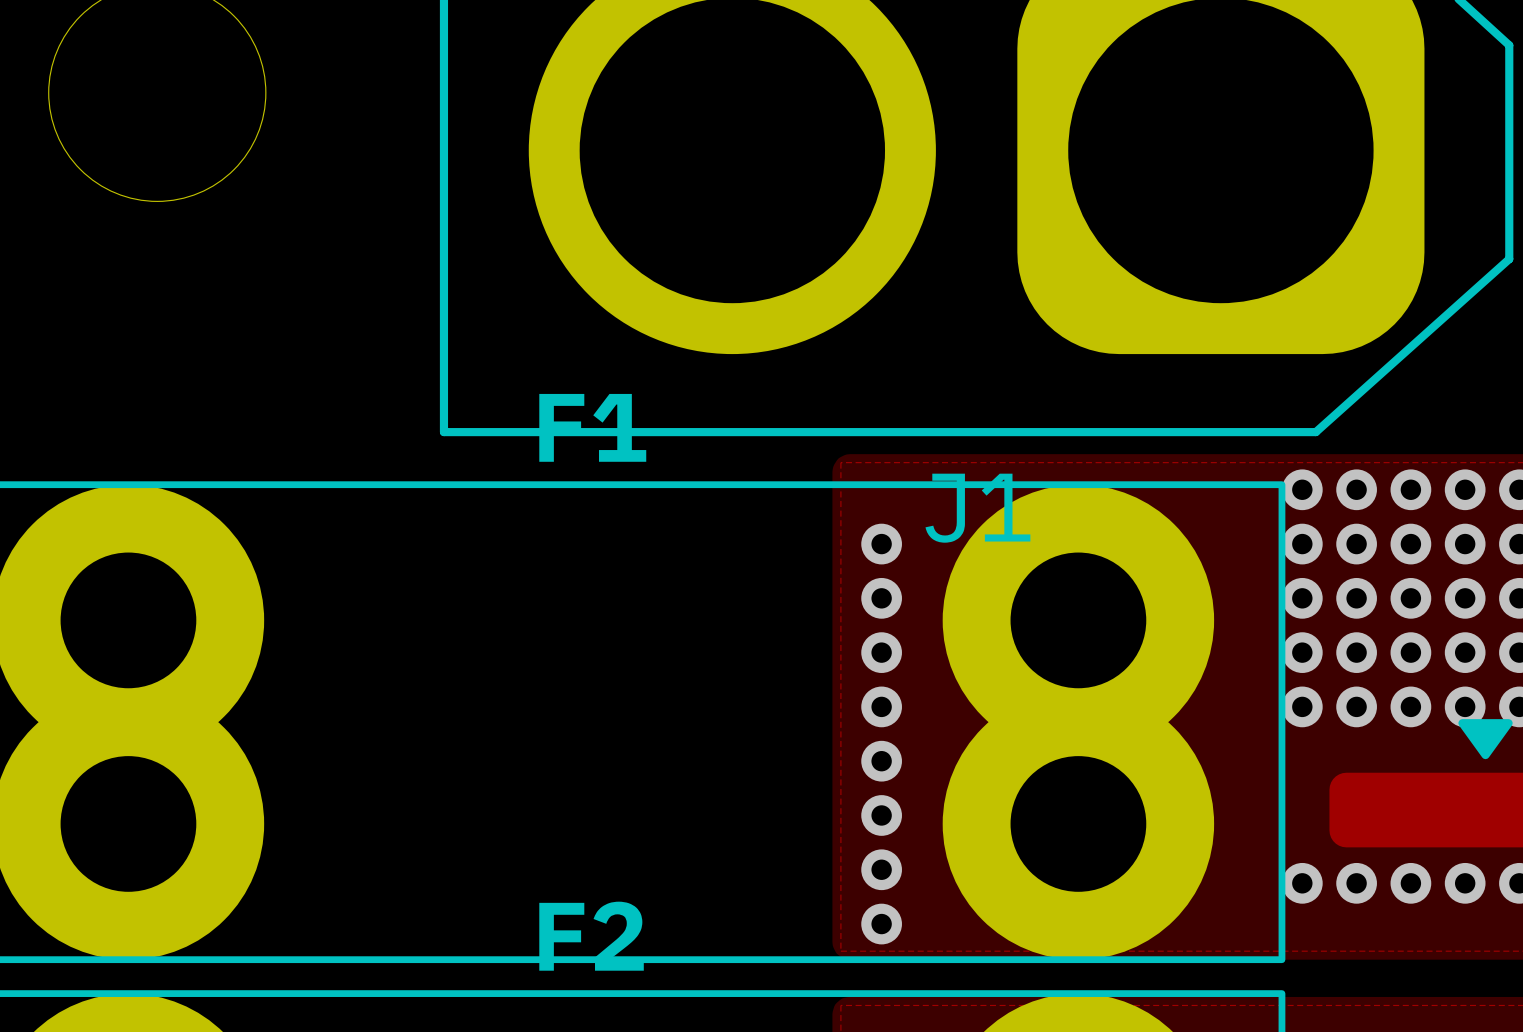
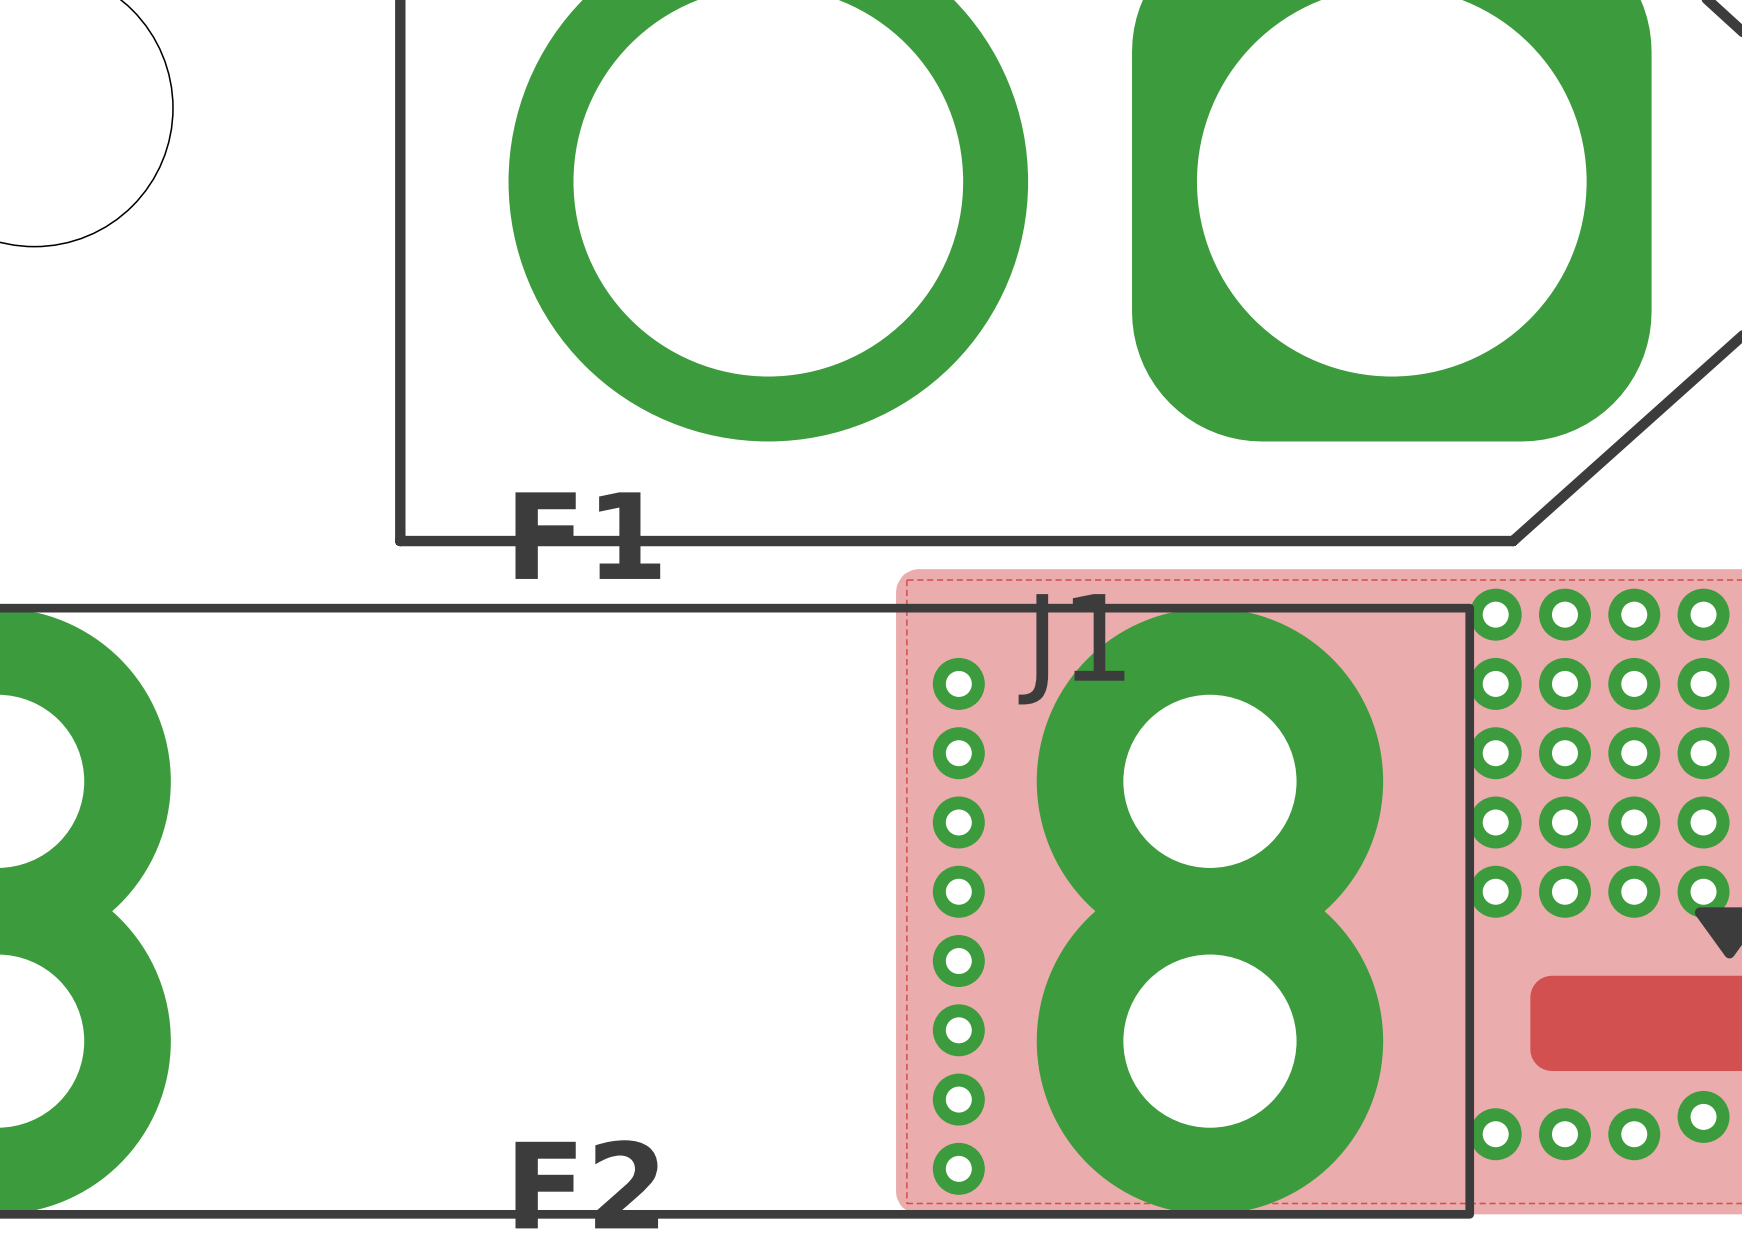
via position: (1302, 883) -> (1495, 1134)
via position: (1356, 883) -> (1564, 1134)
via position: (1410, 883) -> (1634, 1134)

